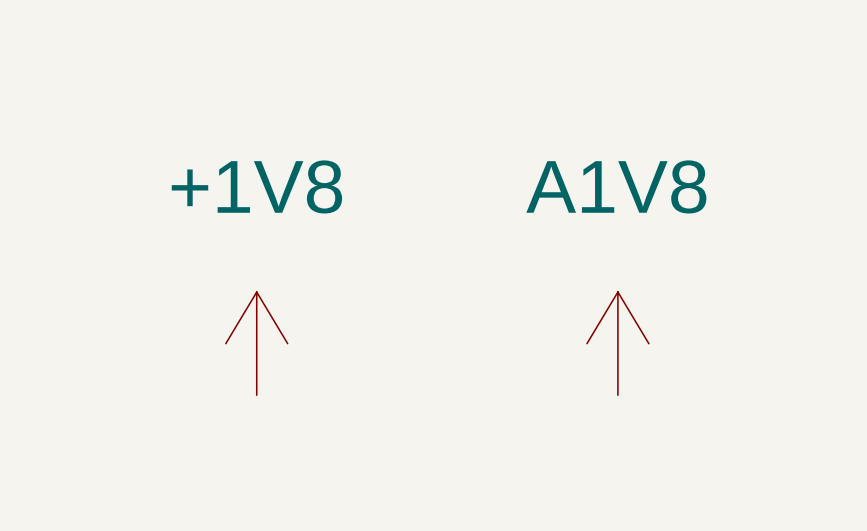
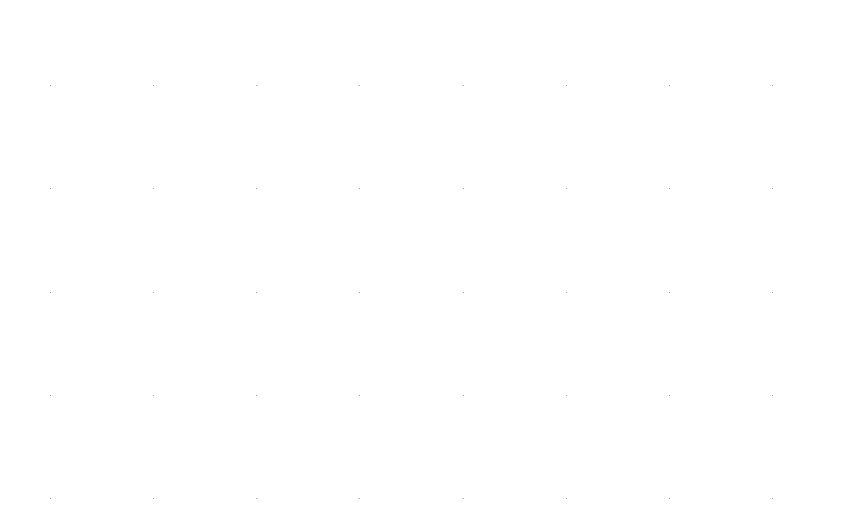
power symbol: +1V8 (256, 343) -> none
power symbol: A1V8 (617, 343) -> none

